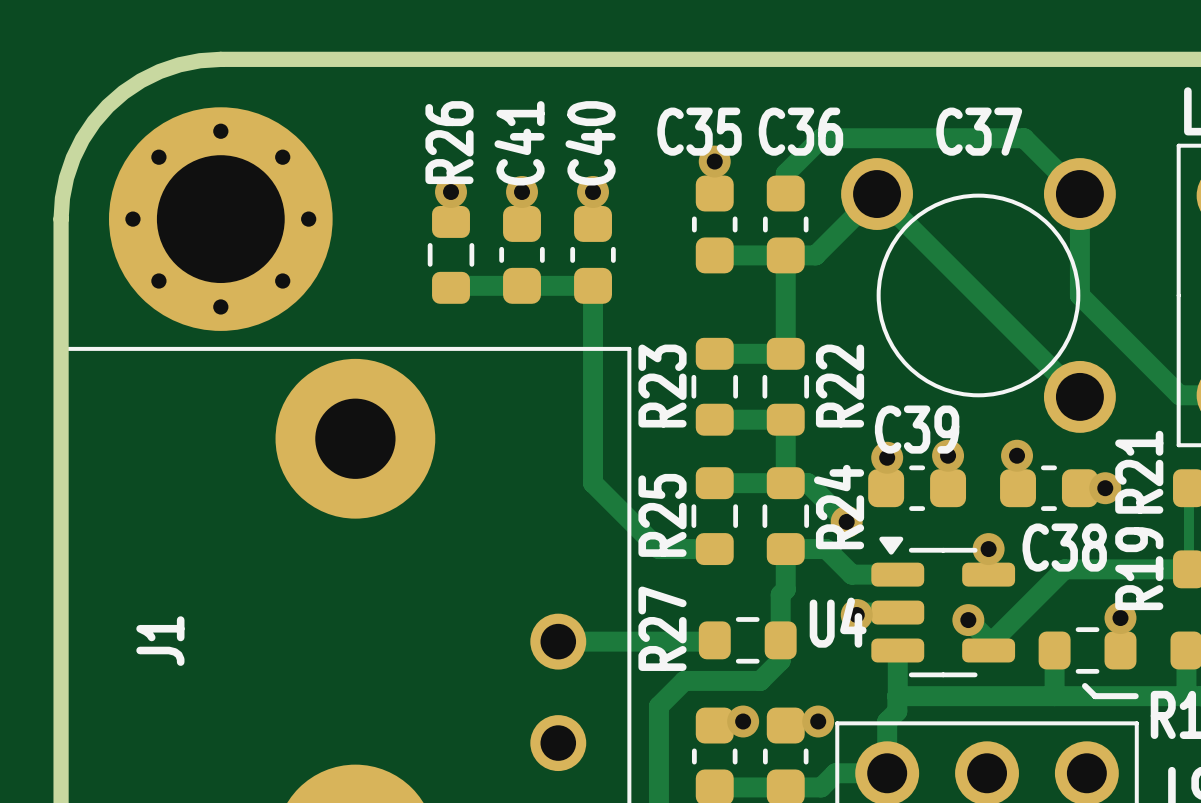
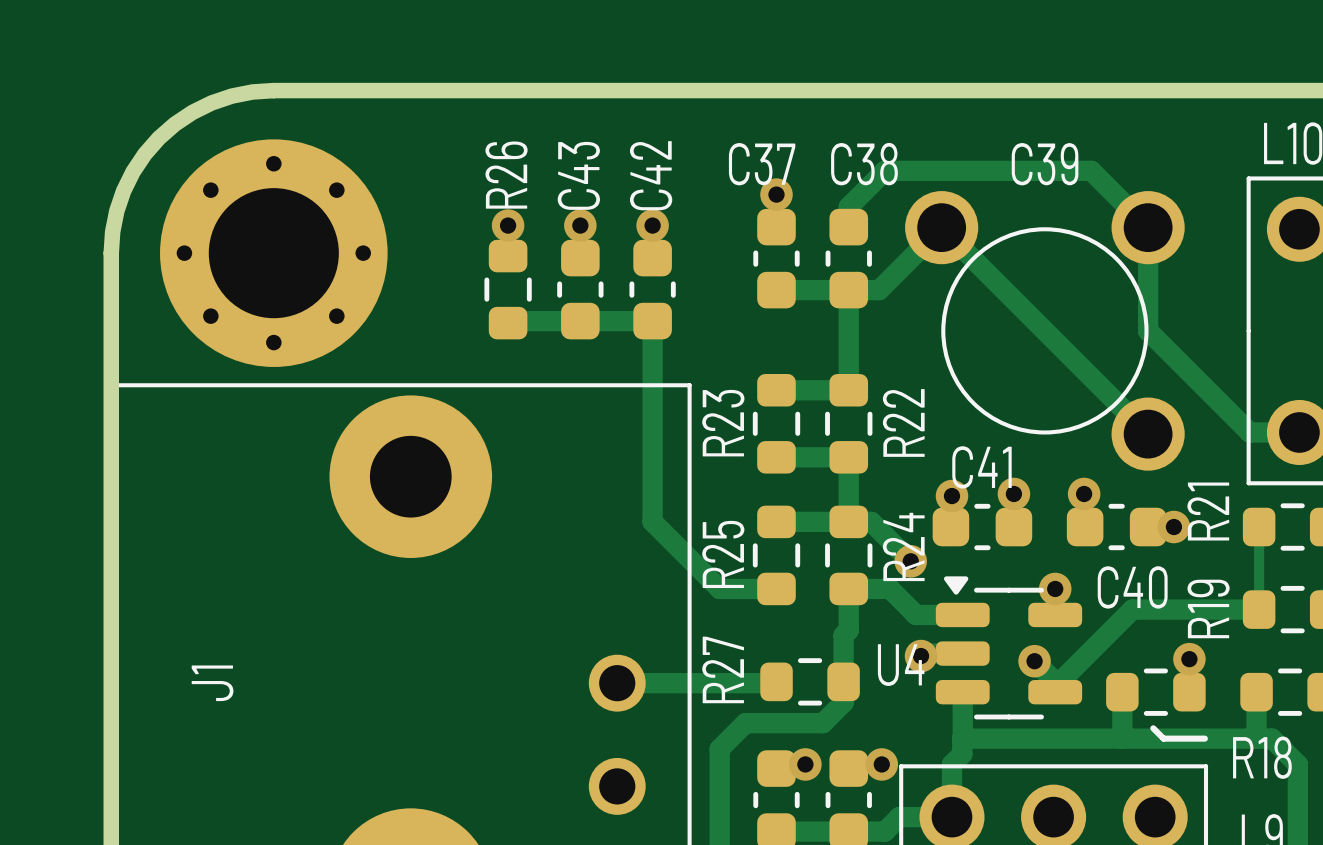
C35 name: C35 (699, 131) -> C37 (762, 164)
C36 name: C36 (800, 131) -> C38 (864, 164)
C37 name: C37 (979, 131) -> C39 (1045, 164)
C41 name: C41 (519, 143) -> C43 (578, 175)
C40 name: C40 (590, 143) -> C42 (651, 175)
C39 name: C39 (917, 429) -> C41 (981, 467)
C38 name: C38 (1064, 547) -> C40 (1132, 587)

